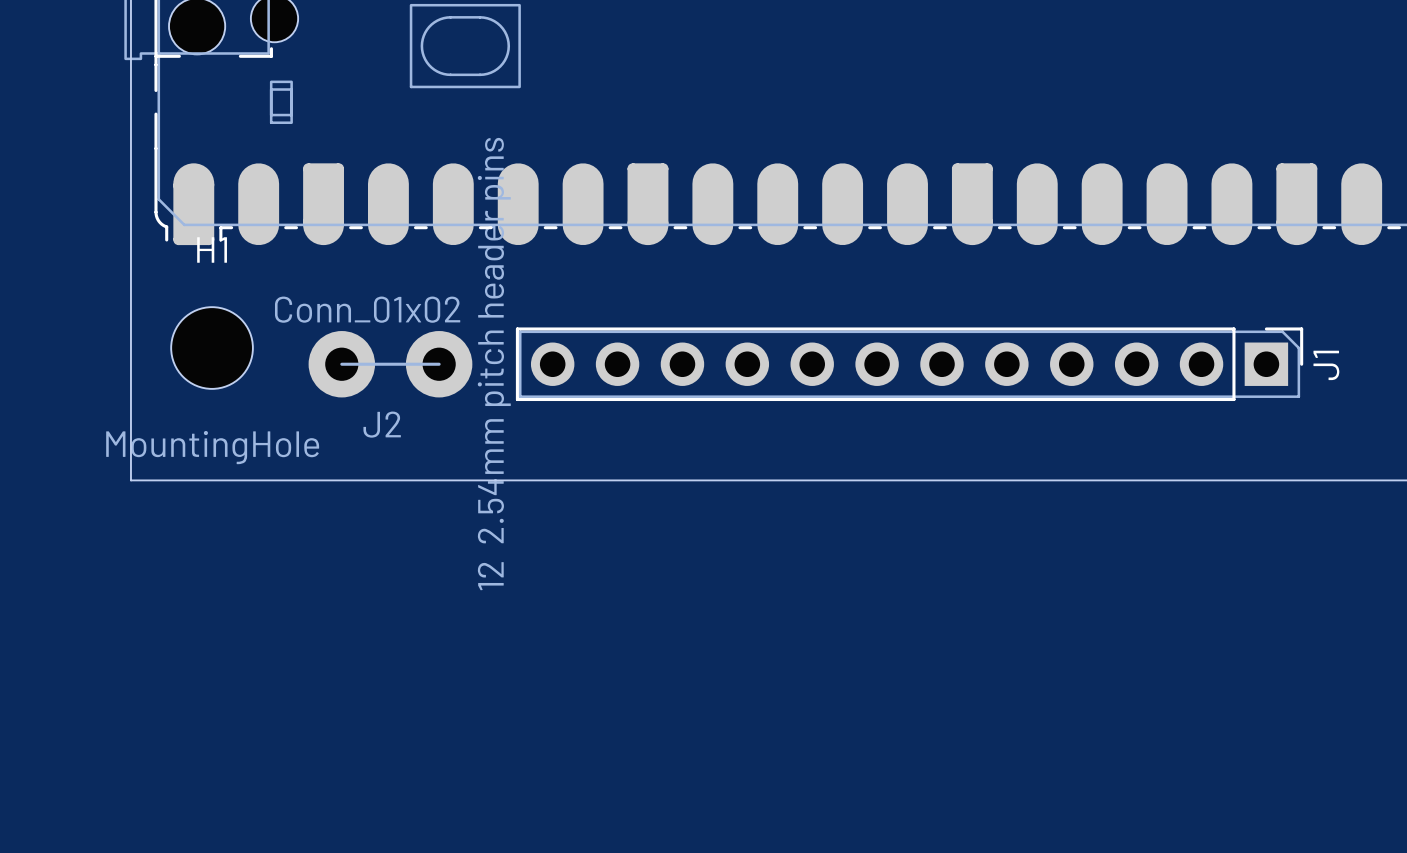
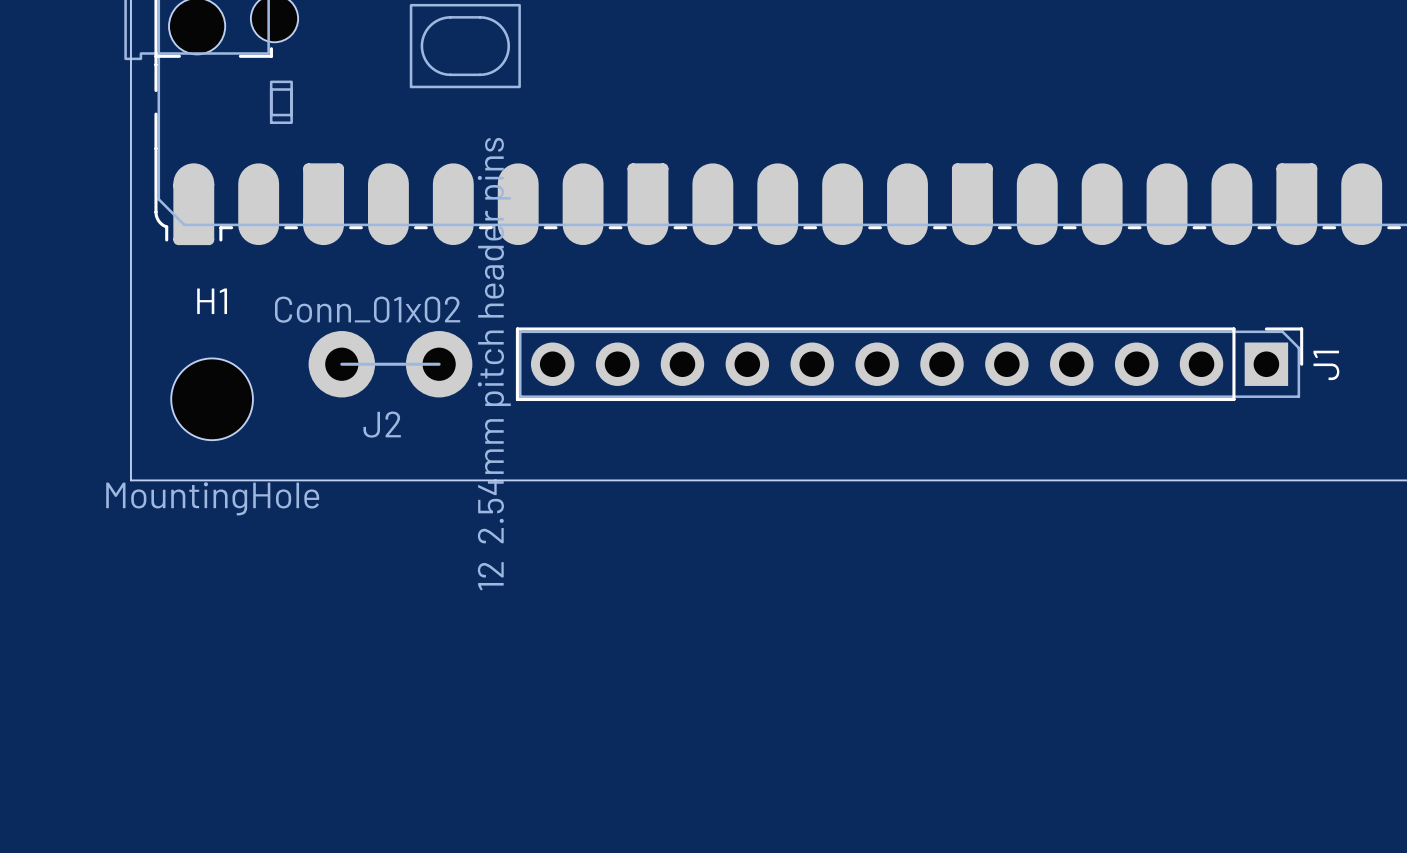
H1 position: (212, 348) -> (212, 399)

